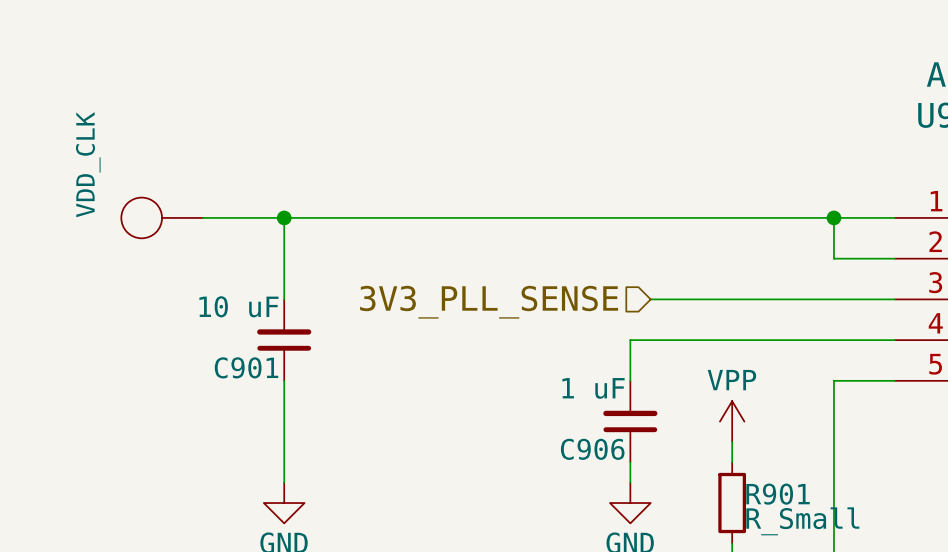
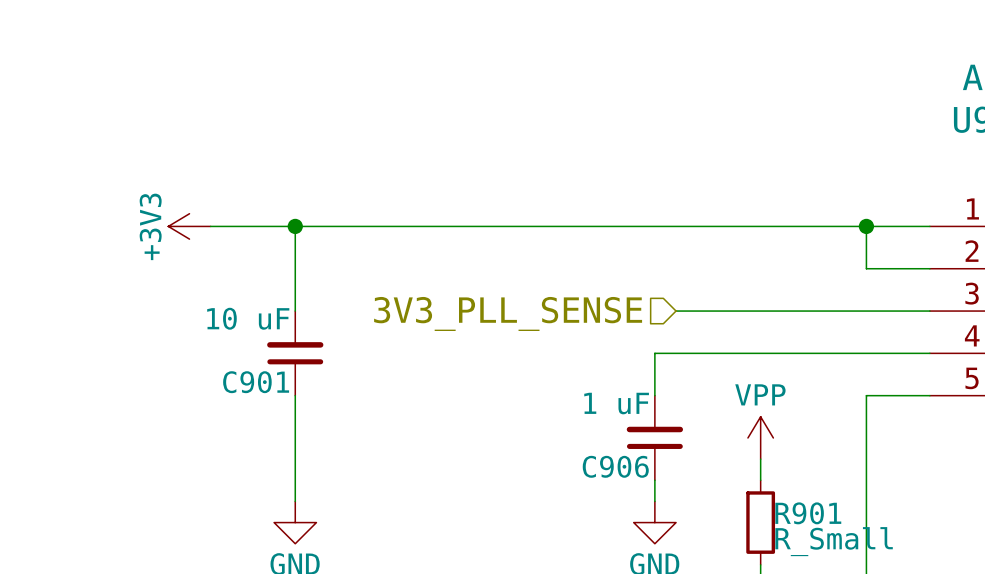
power symbol: VDD_CLK (162, 217) -> none
power symbol: none -> +3V3 (189, 226)

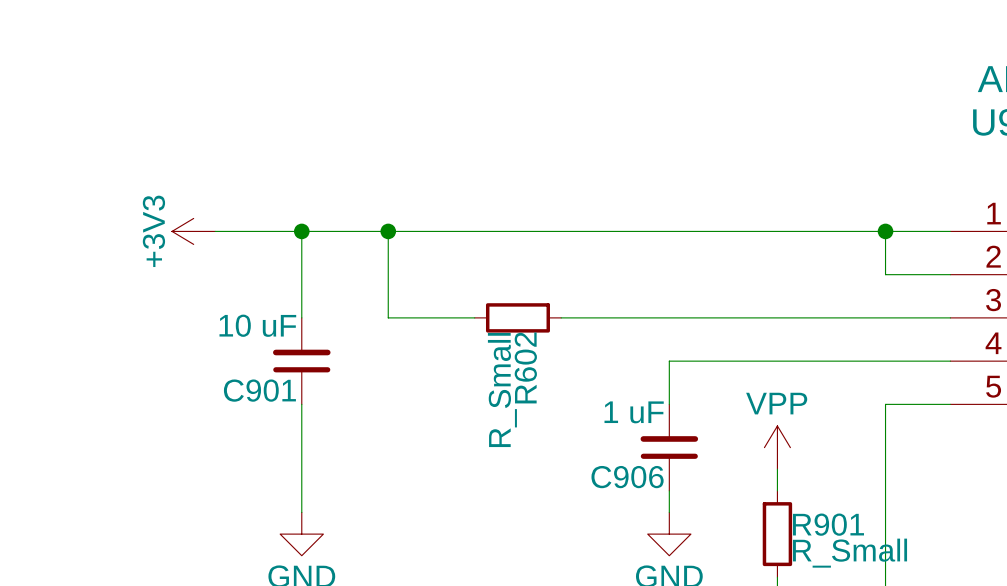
wire: none -> (388, 231) (388, 317) (474, 317)
junction: none -> (388, 231)
R602: none -> R_Small (517, 317)
wire: none -> (561, 317) (690, 317)
hierarchical label: 3V3_PLL_SENSE (508, 313) -> none

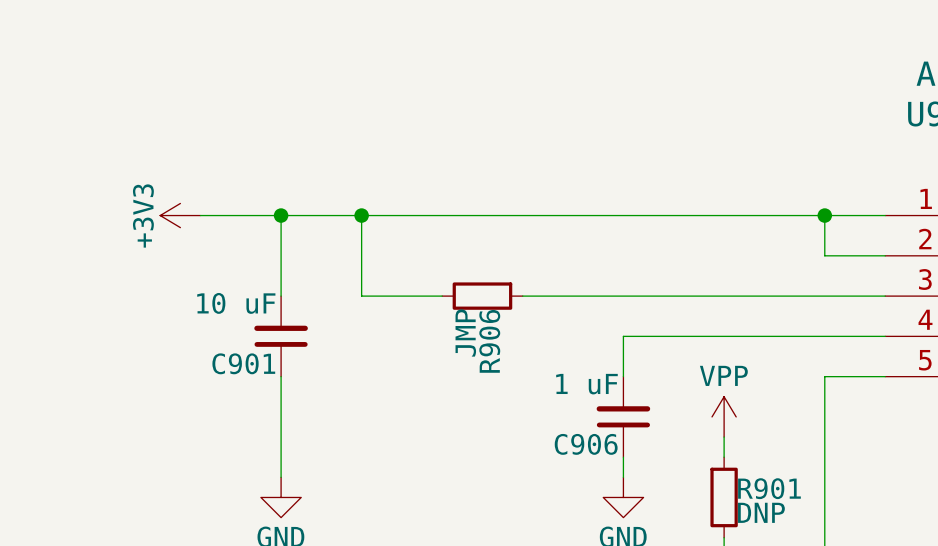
R602 name: R602 (525, 367) -> R906 (489, 341)
R602 value: R_Small (502, 390) -> JMP (465, 333)
R901 value: R_Small (850, 553) -> DNP (761, 512)

